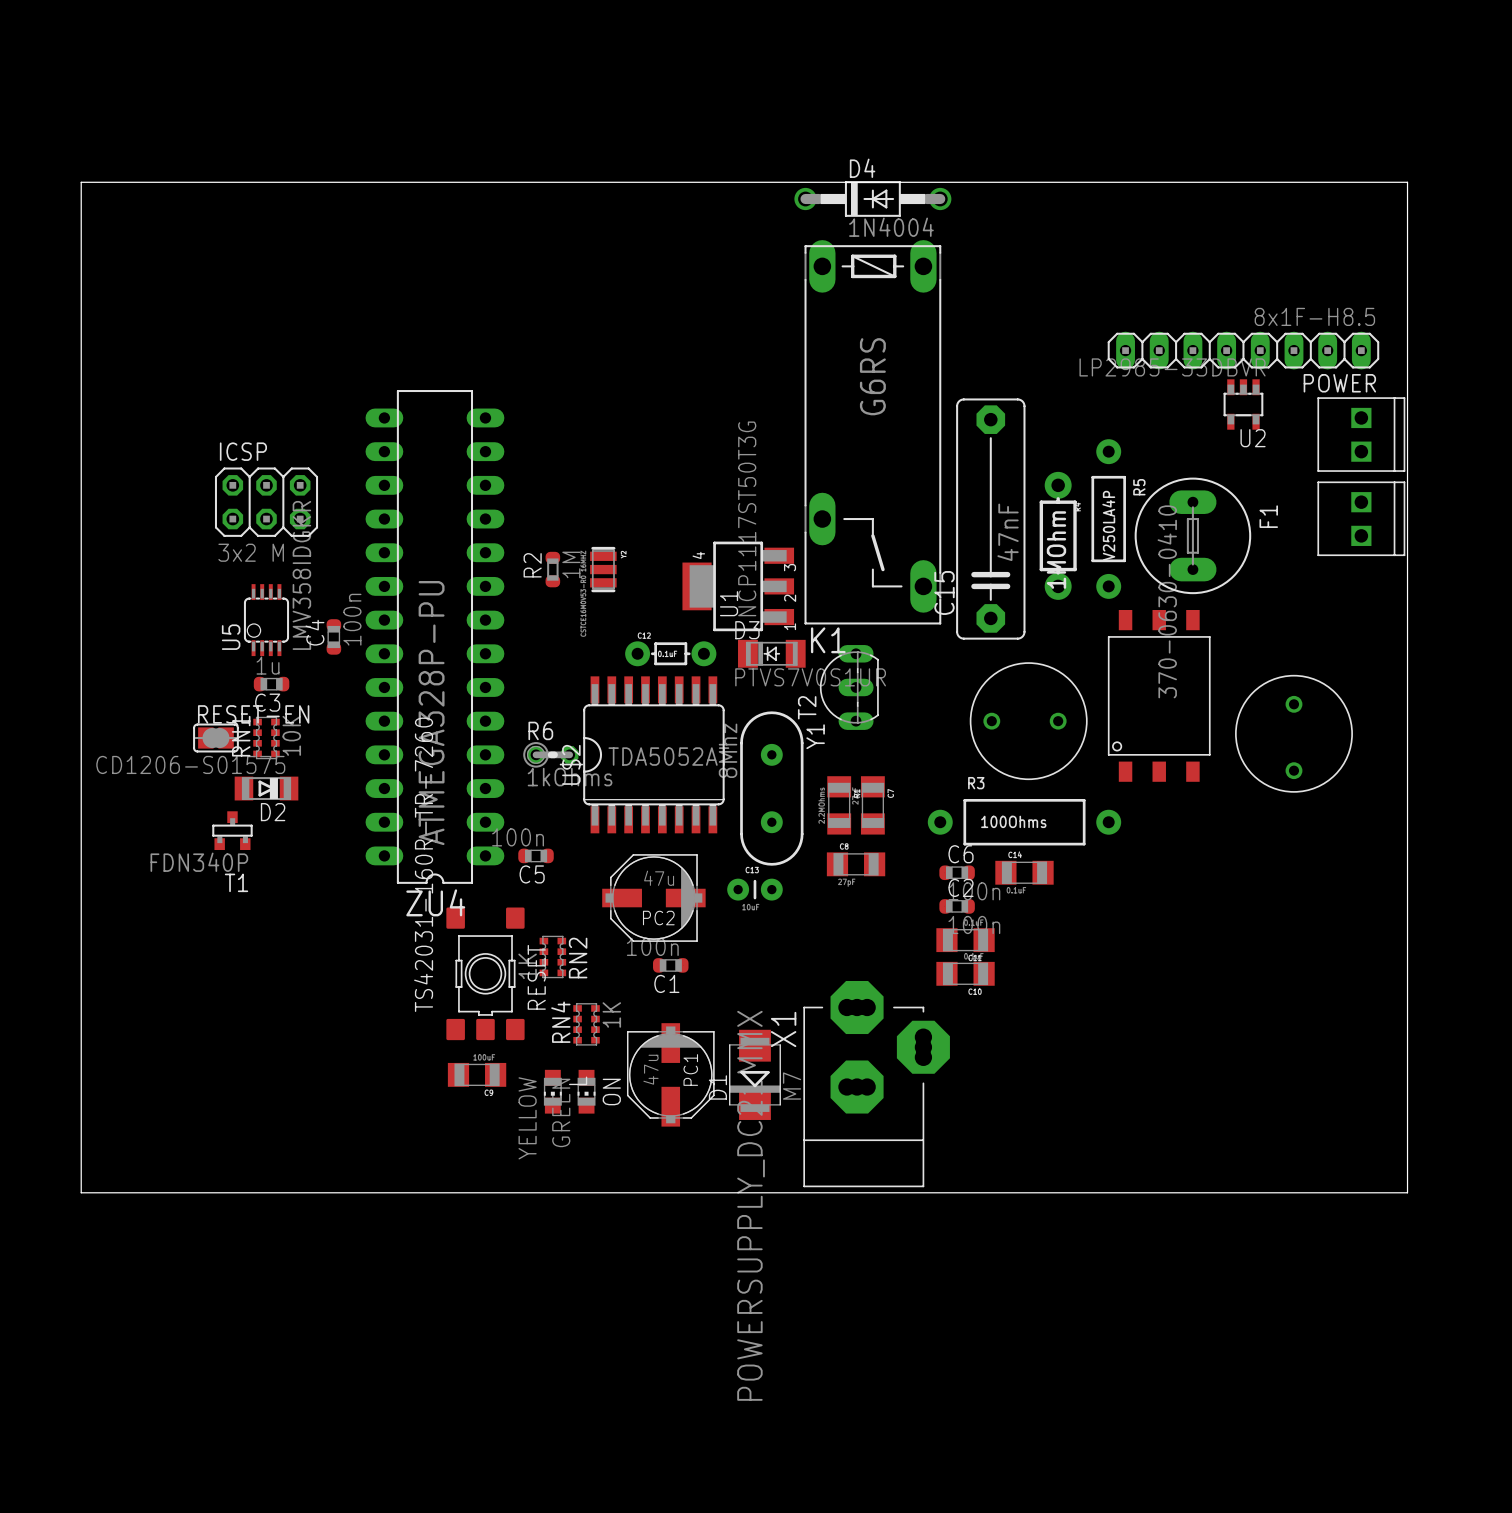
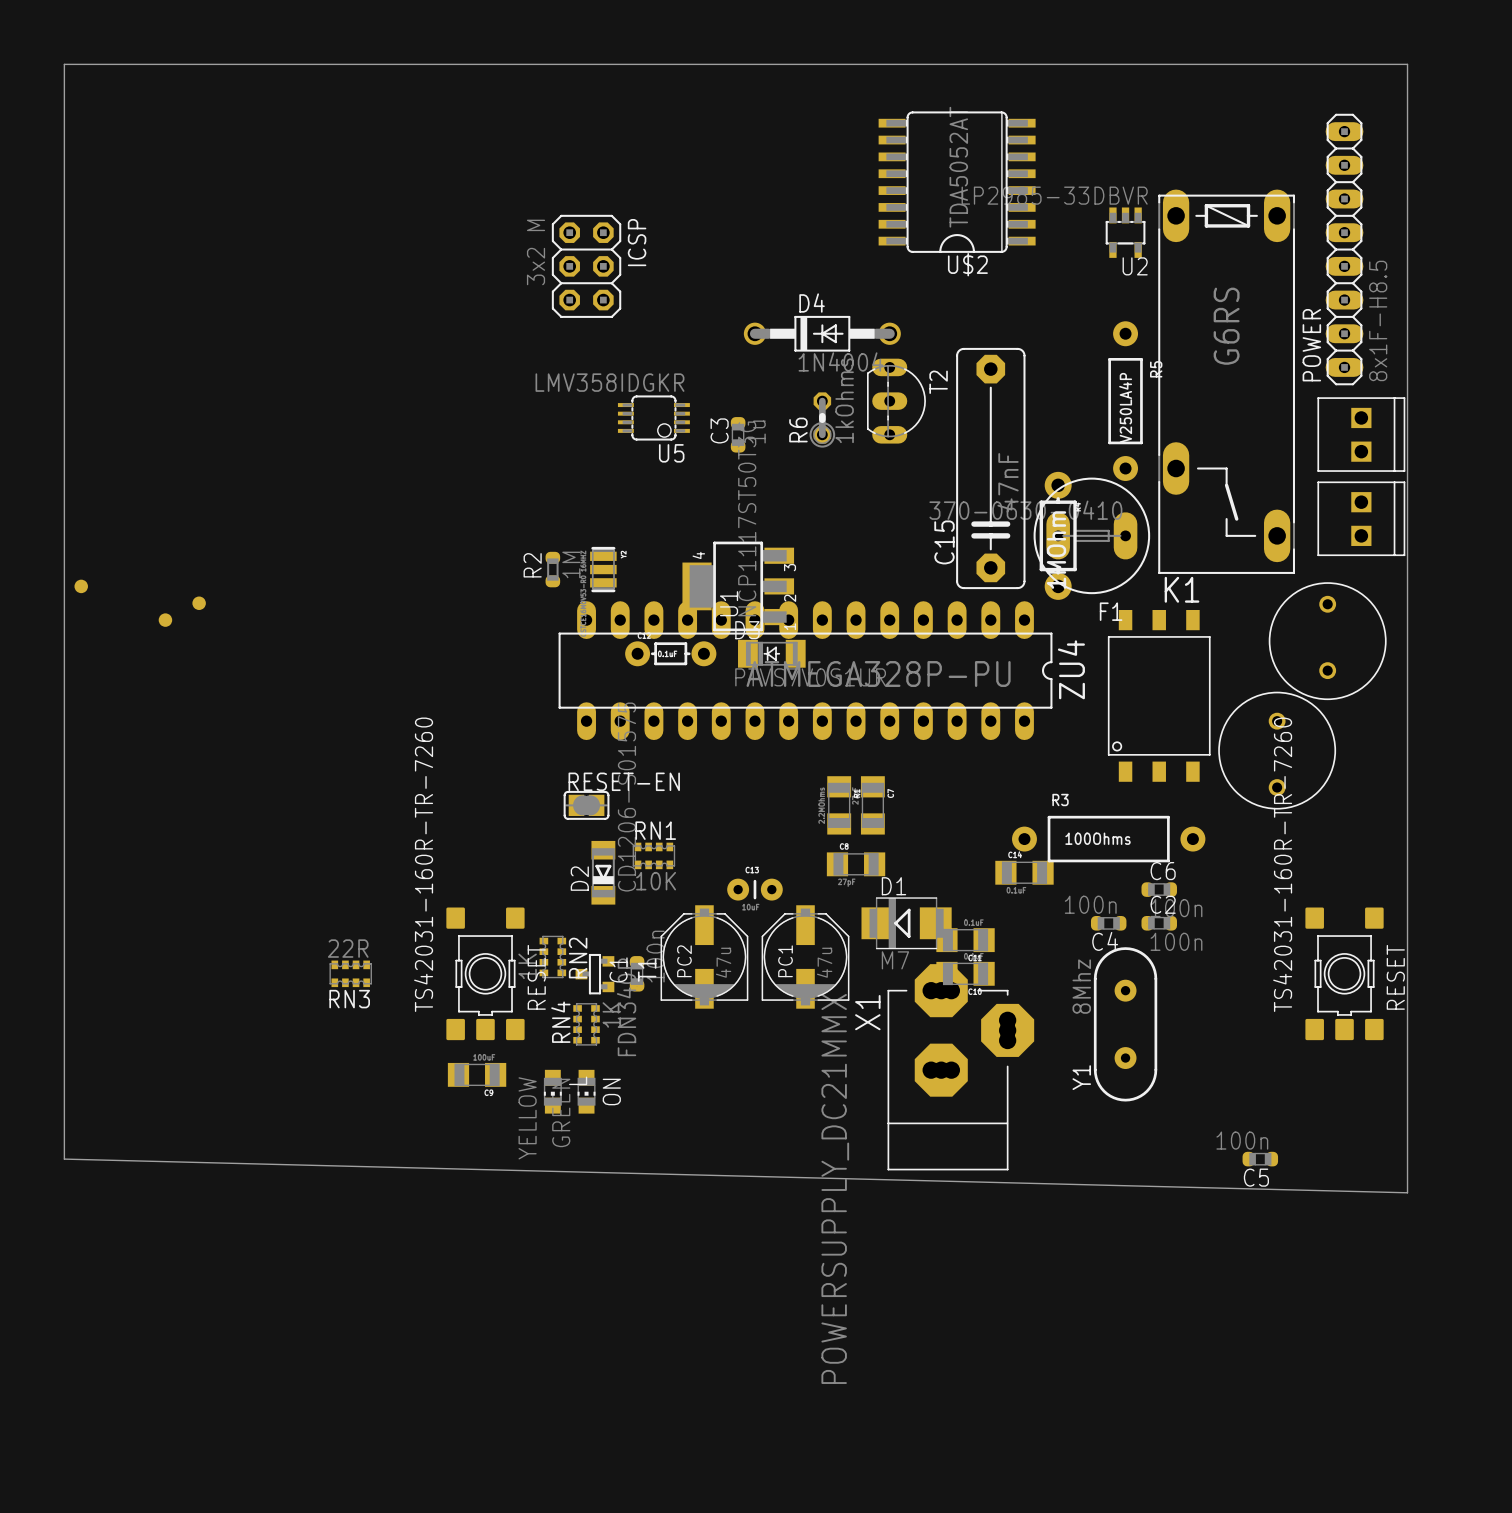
board edge: (1407, 182) (81, 182) (81, 1192) (1407, 1192) -> (1407, 182) (1407, 64) (64, 64) (64, 1159) (1407, 1192)
D4 position: (872, 199) -> (822, 333)
ICSP: none -> 3x2 M (586, 266)
POWER rotation: 0° (1243, 350) -> 90° clockwise (1344, 249)
U2 position: (1243, 404) -> (1125, 232)
K1 position: (872, 432) -> (1226, 381)
ICSP: 3x2 M (266, 502) -> none
C15 position: (990, 519) -> (990, 468)
R5 position: (1108, 519) -> (1125, 401)
F1 rotation: 0° (1192, 535) -> 90° clockwise (1091, 535)
F1 position: (1192, 535) -> (1091, 535)
part: none -> (81, 586)
part: none -> (199, 603)
C4 value position: 100n (352, 619) -> 100n (1090, 904)
part: none -> (165, 620)
U5 rotation: 0° (266, 620) -> 90° counterclockwise (653, 417)
U5 position: (266, 620) -> (653, 417)
C4 name position: C4 (314, 632) -> C4 (1105, 941)
C4 rotation: 0° (333, 636) -> 90° clockwise (1108, 923)
C4 position: (333, 636) -> (1108, 923)
ZU4 rotation: 0° (434, 636) -> 90° counterclockwise (805, 670)
ZU4 position: (434, 636) -> (805, 670)
part: none -> (1327, 641)
C3 rotation: 0° (271, 684) -> 90° clockwise (738, 434)
C3 position: (271, 684) -> (738, 434)
T2 rotation: 0° (849, 687) -> 180° (896, 401)
T2 position: (849, 687) -> (896, 401)
part: (1028, 721) -> none
part position: (1293, 733) -> (1277, 750)
Y1 name position: Y1 (815, 736) -> Y1 (1081, 1077)
RESET-EN: (215, 738) -> none
RN1 rotation: 0° (266, 738) -> 90° clockwise (653, 855)
RN1 position: (266, 738) -> (653, 855)
R6 rotation: 0° (550, 754) -> 90° counterclockwise (822, 419)
R6 position: (550, 754) -> (822, 419)
U$2 rotation: 0° (653, 754) -> 90° counterclockwise (957, 182)
U$2 position: (653, 754) -> (957, 182)
D2 rotation: 0° (266, 788) -> 90° clockwise (603, 872)
D2 position: (266, 788) -> (603, 872)
Y1 position: (771, 788) -> (1125, 1024)
RESET-EN: none -> (586, 805)
R3 position: (1024, 822) -> (1108, 839)
T1 rotation: 0° (232, 830) -> 90° counterclockwise (594, 974)
T1 position: (232, 830) -> (594, 974)
C5 position: (536, 855) -> (1260, 1159)
C6 position: (957, 872) -> (1159, 889)
PC2 rotation: 0° (653, 898) -> 90° clockwise (704, 956)
PC2 position: (653, 898) -> (704, 956)
C2 position: (957, 906) -> (1159, 923)
C1 rotation: 0° (670, 965) -> 90° clockwise (637, 973)
C1 position: (670, 965) -> (637, 973)
RN3: none -> 22R (350, 973)
RESET: none -> TS42031-160R-TR-7260 (1344, 973)
PC1 rotation: 0° (670, 1074) -> 180° (805, 956)
PC1 position: (670, 1074) -> (805, 956)
D1 rotation: 0° (754, 1074) -> 90° clockwise (906, 923)
D1 position: (754, 1074) -> (906, 923)
X1 position: (876, 1084) -> (960, 1067)

